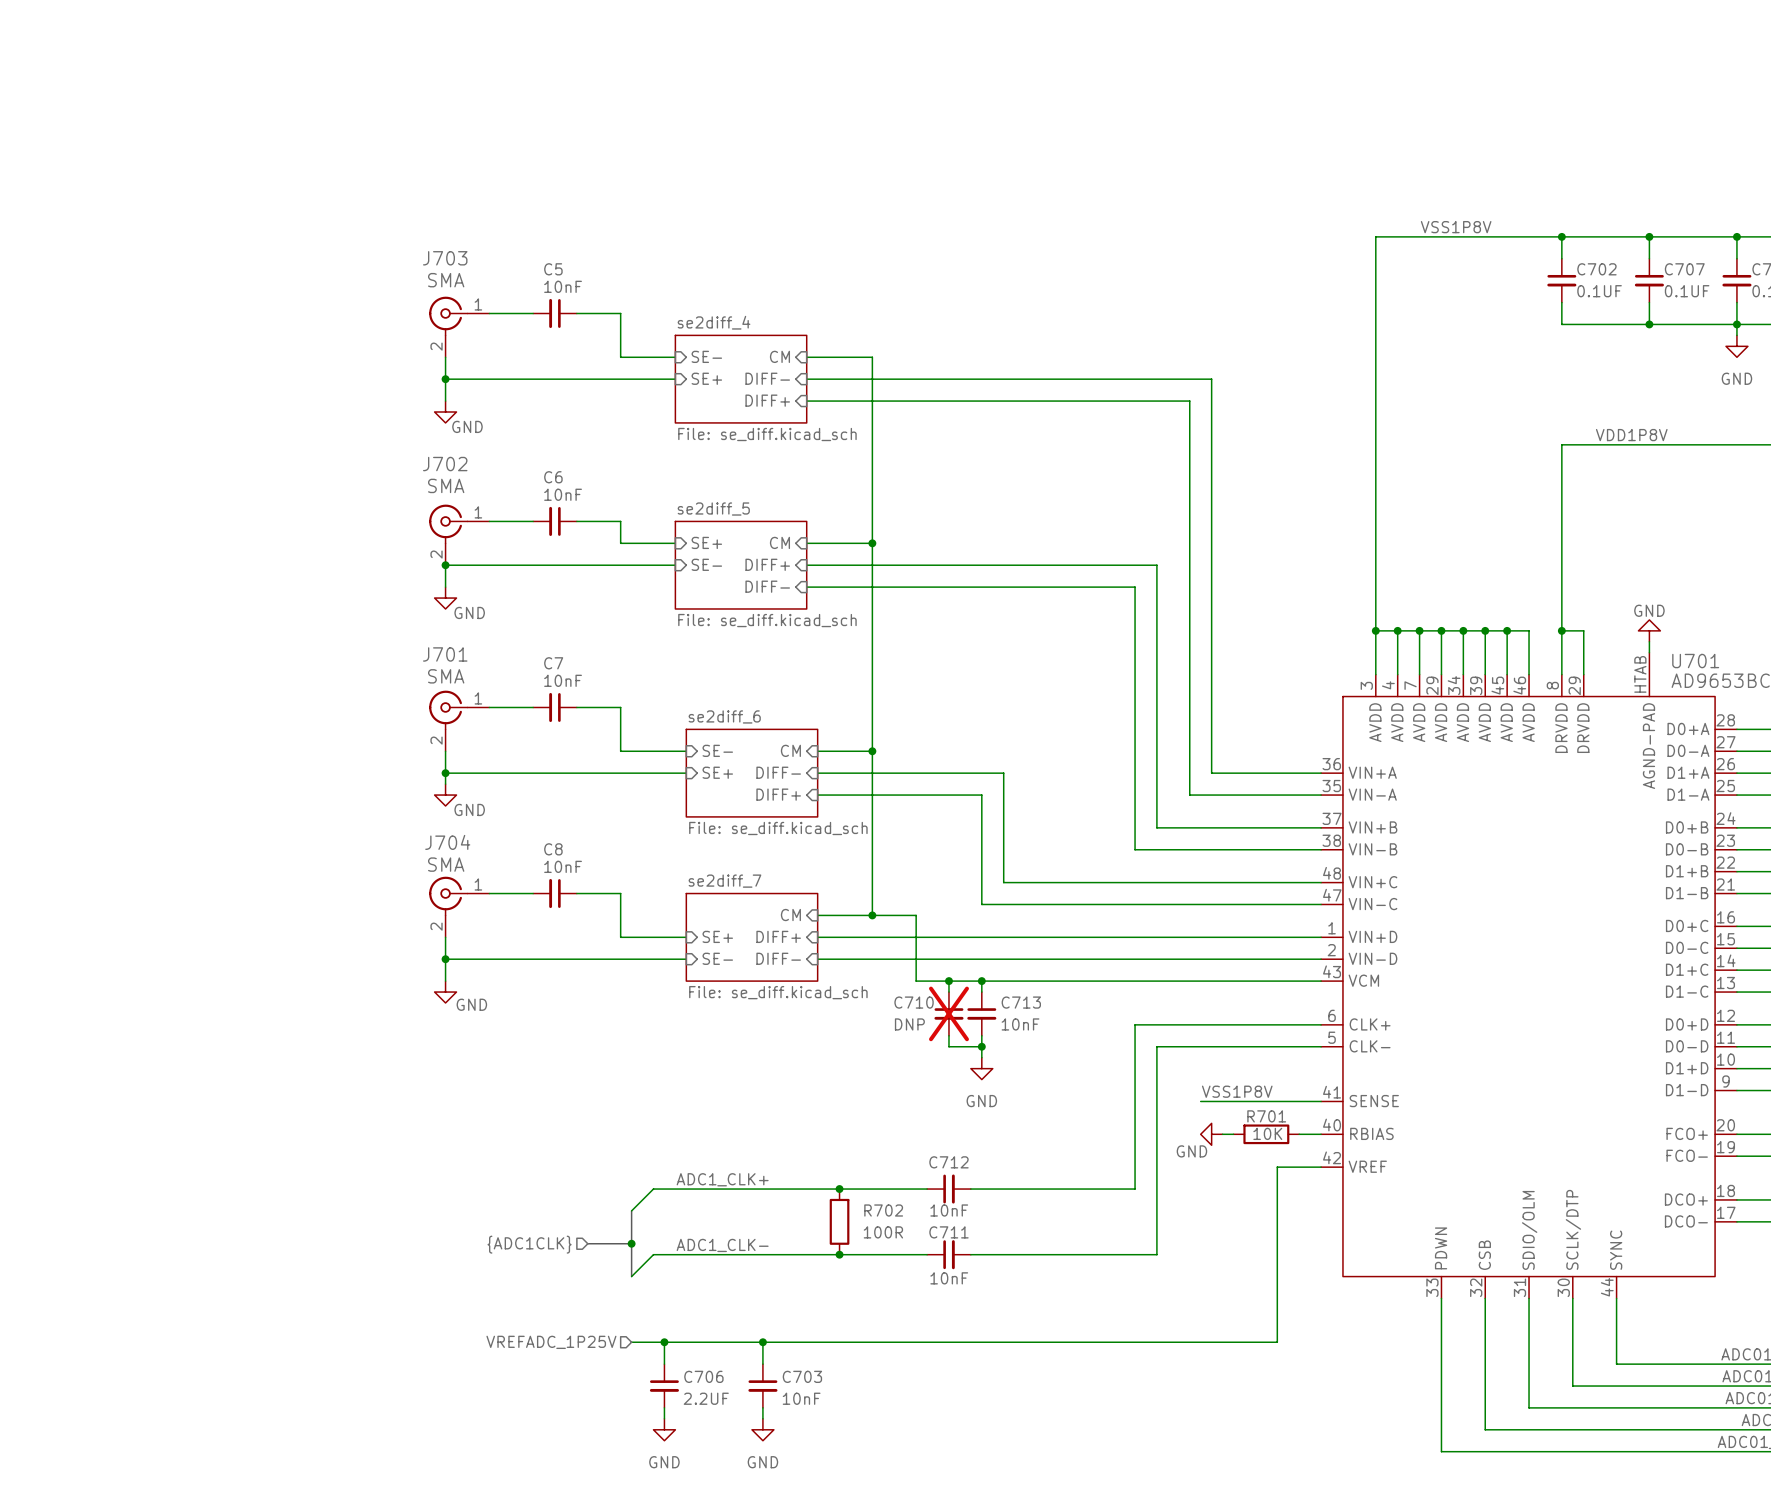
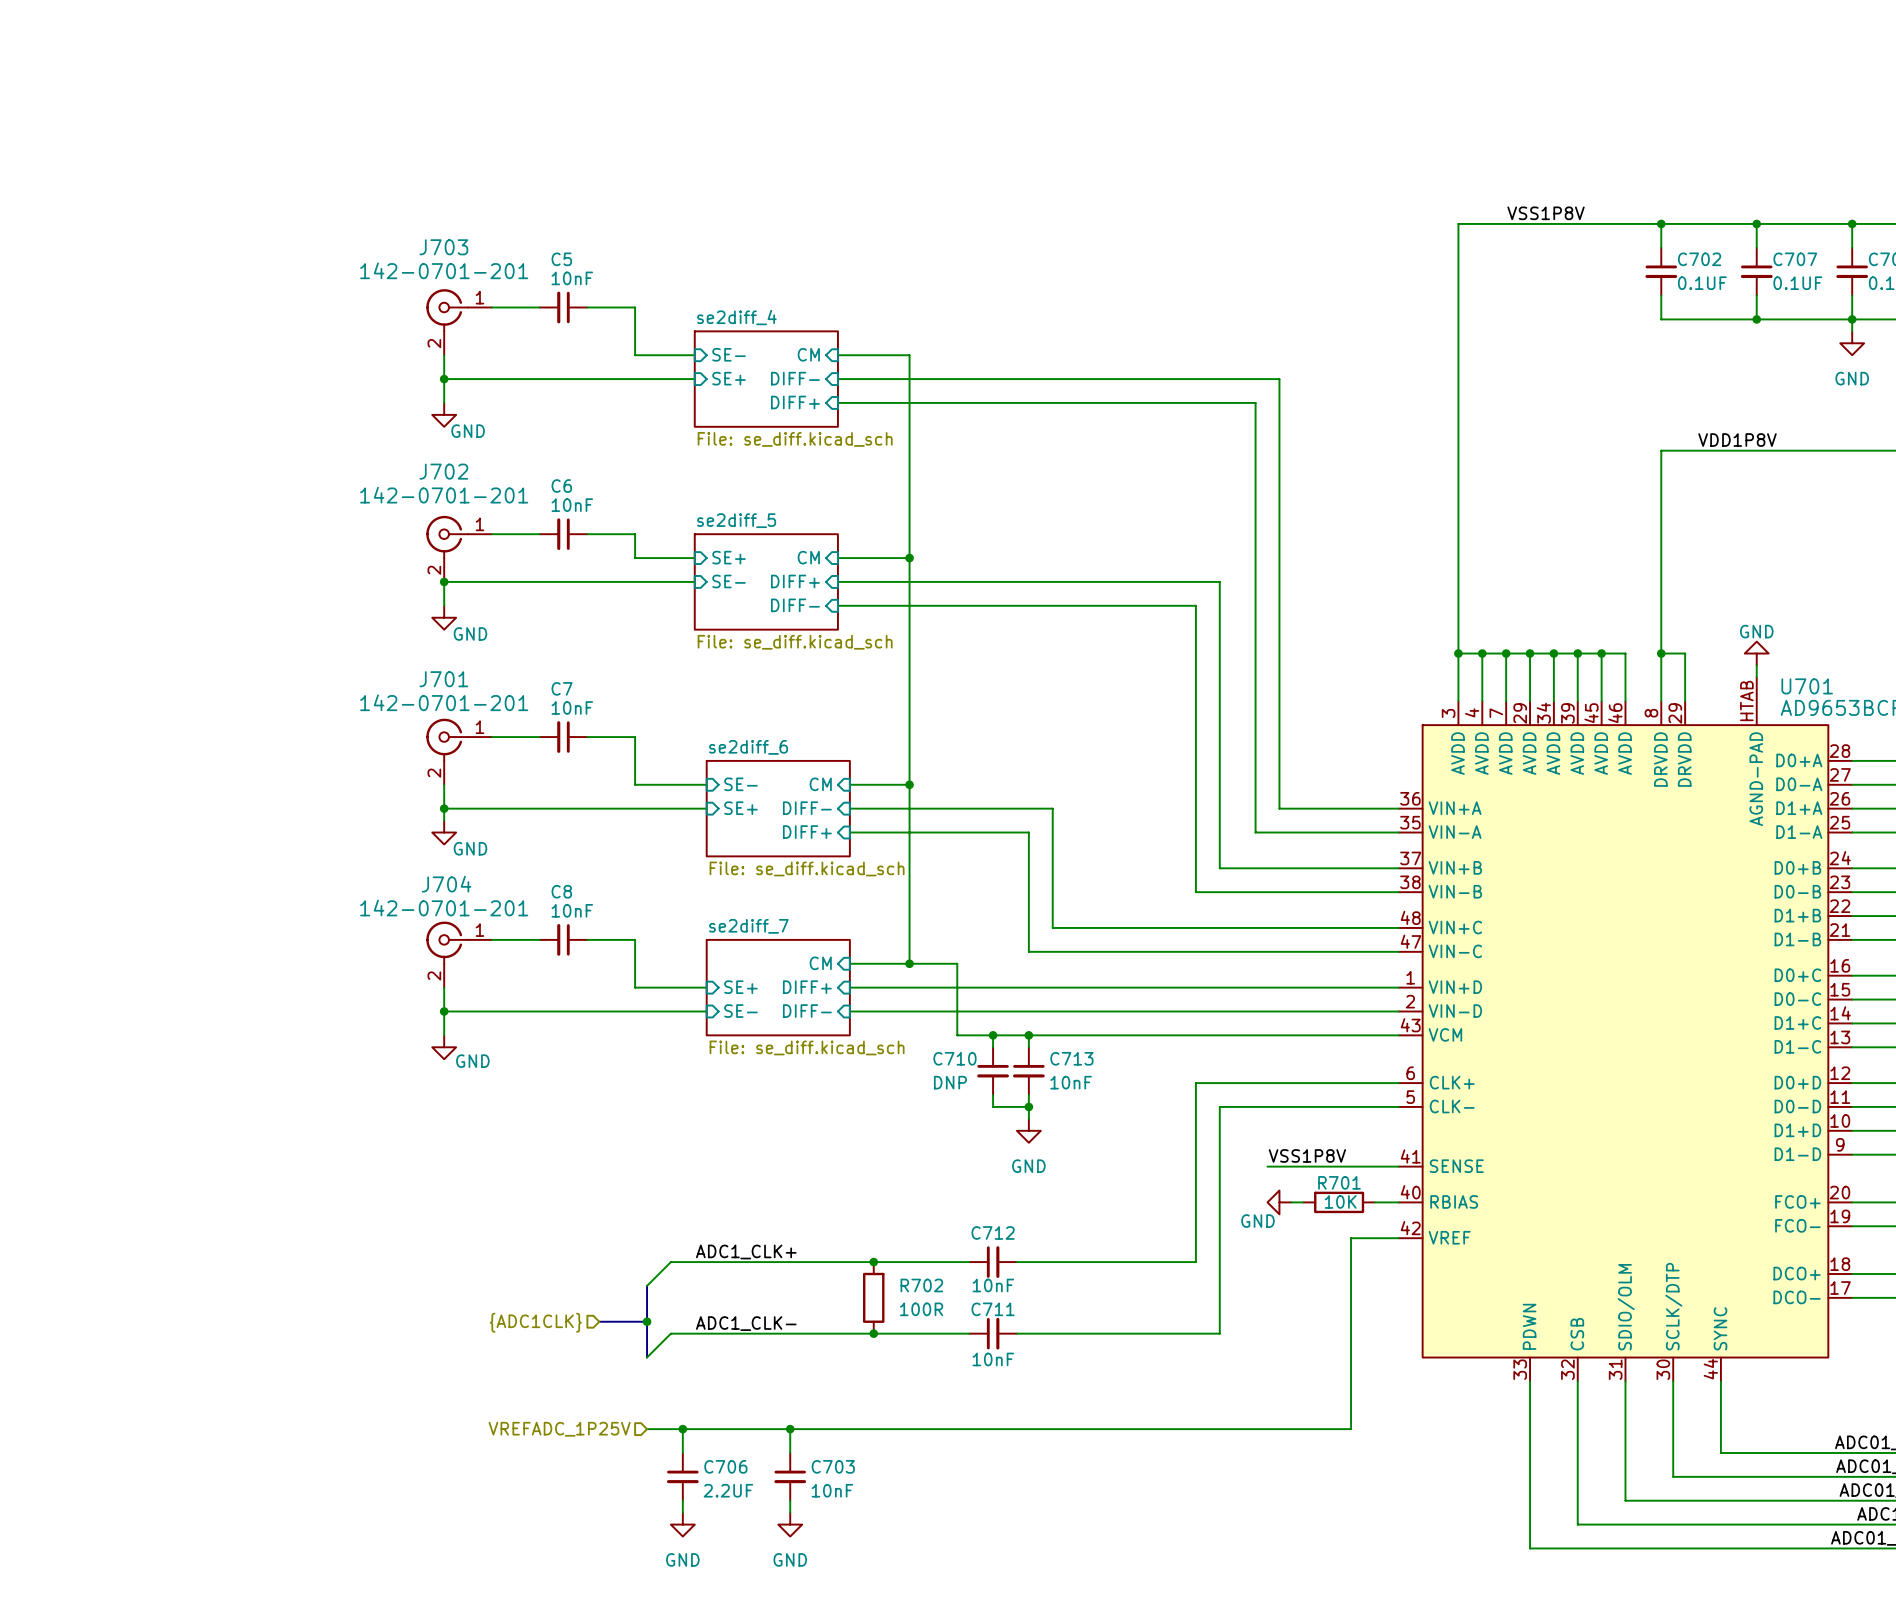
J703 value: SMA (446, 280) -> 142-0701-201 (444, 270)
J702 value: SMA (446, 485) -> 142-0701-201 (444, 495)
J701 value: SMA (446, 676) -> 142-0701-201 (444, 702)
J704 value: SMA (446, 864) -> 142-0701-201 (444, 908)
C710 do-not-place cross: (948, 1013) -> none

